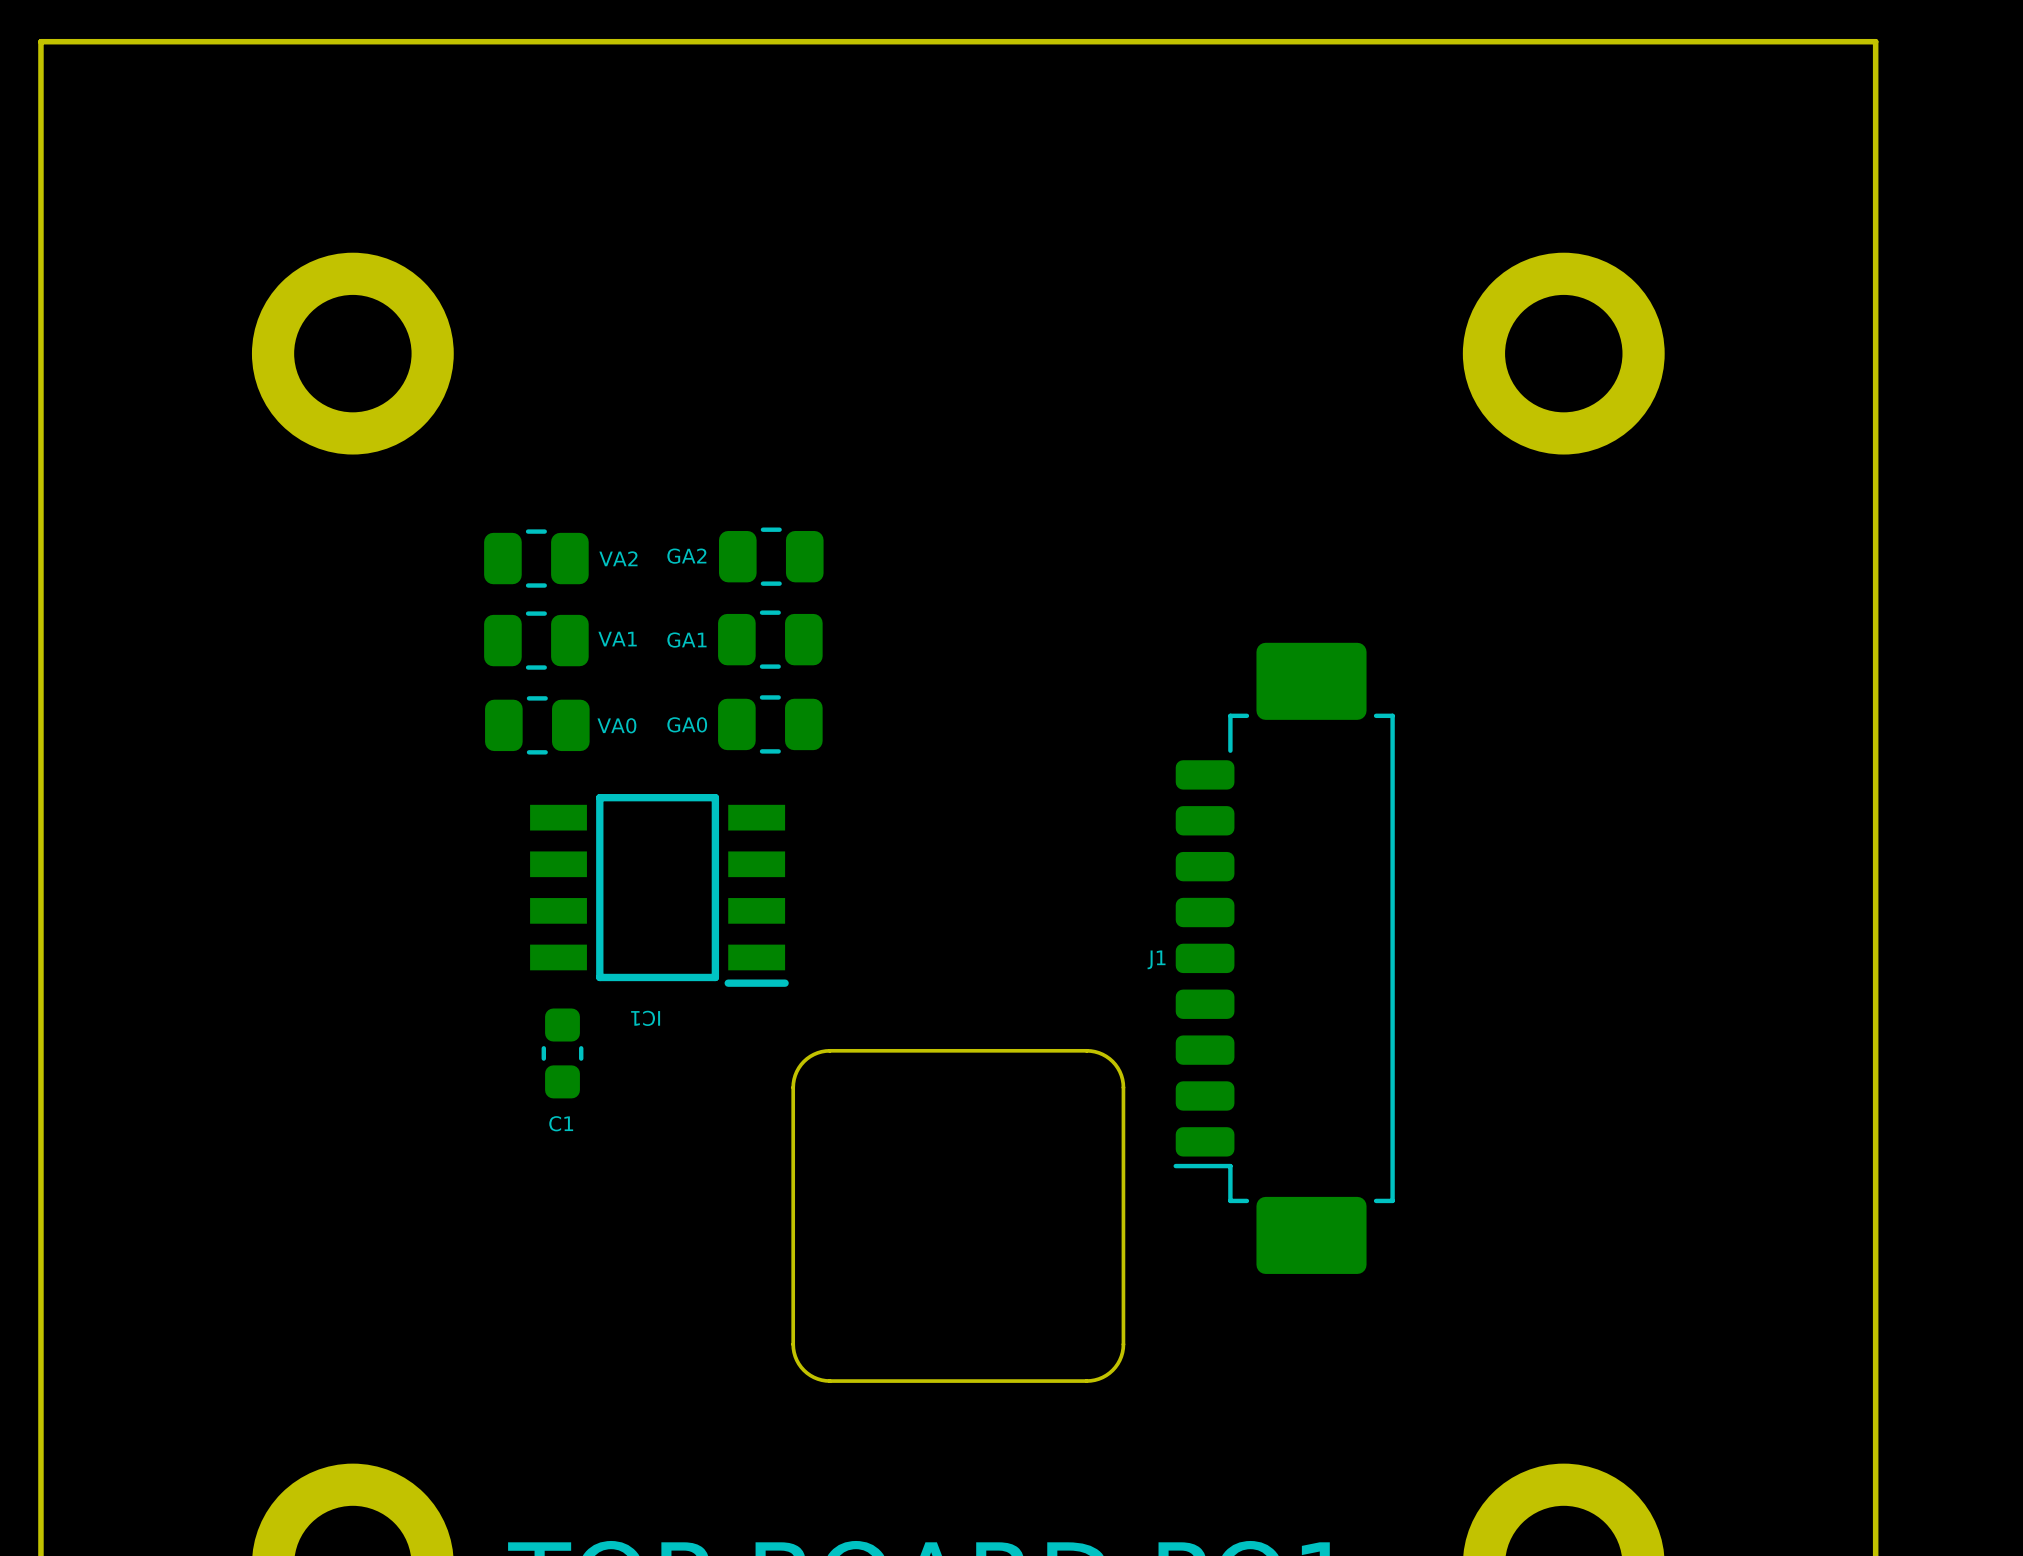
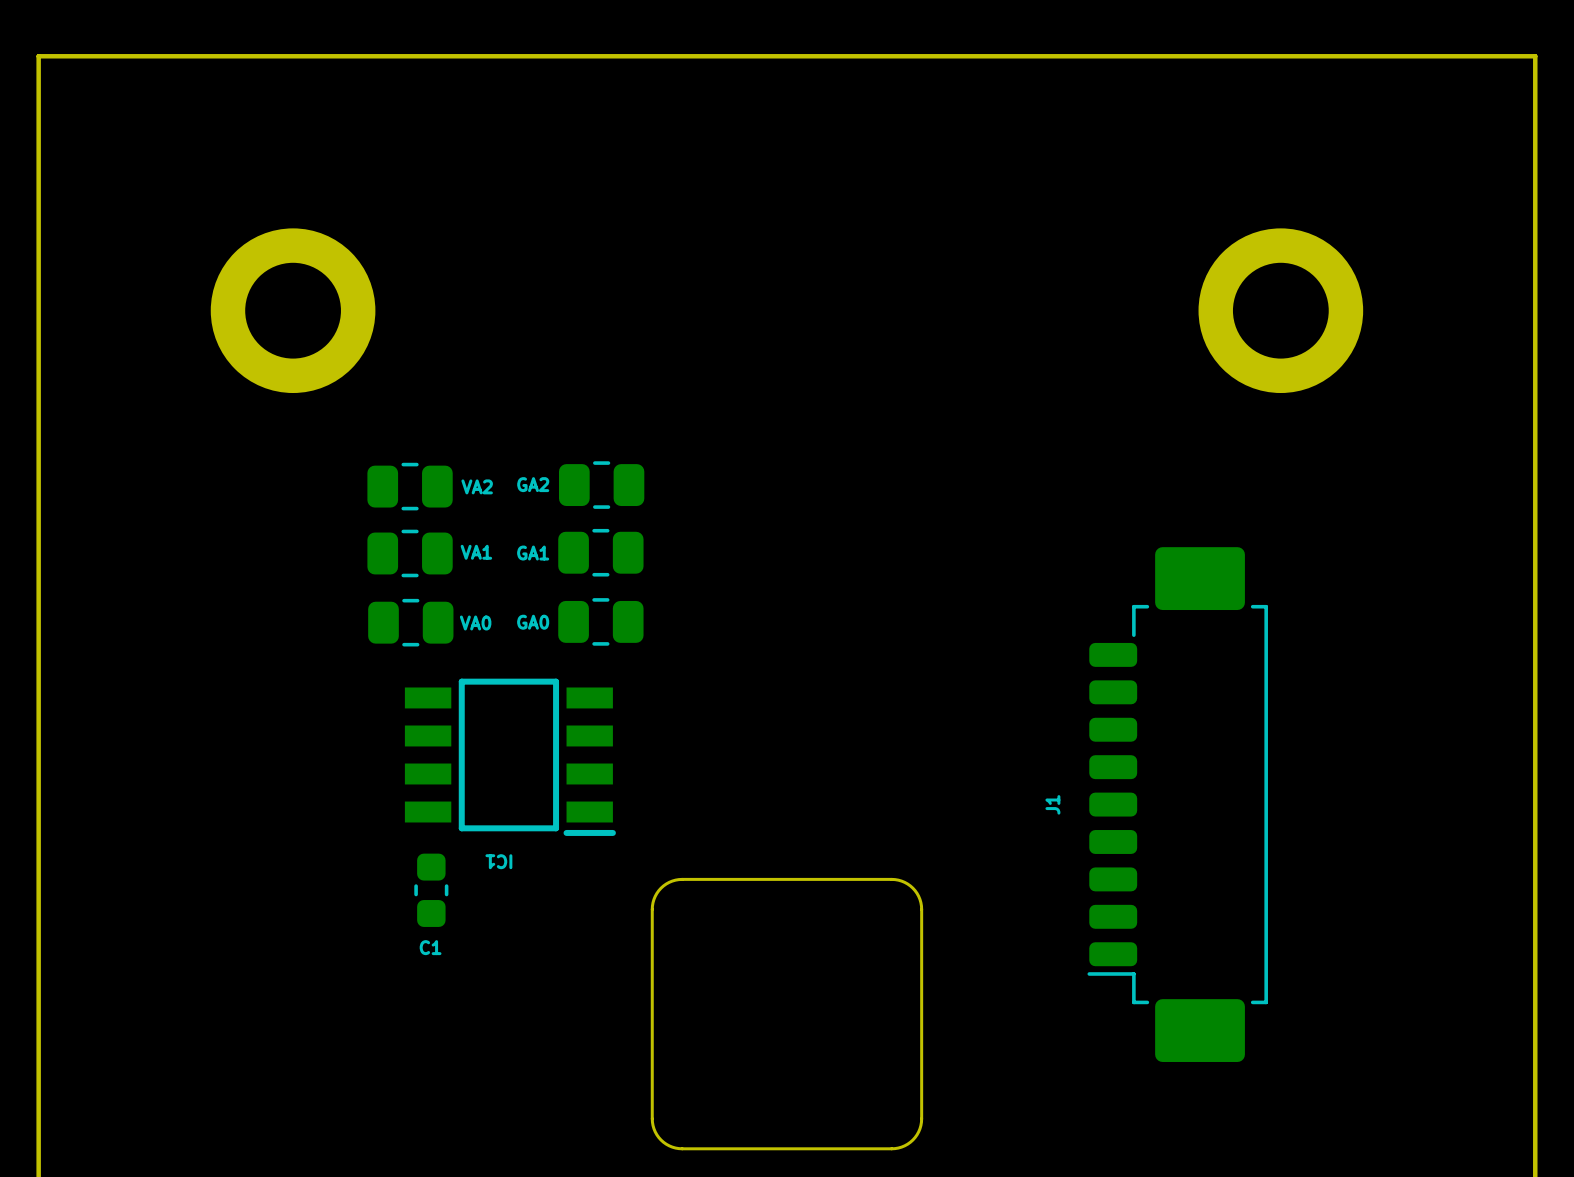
GA2 position: (771, 556) -> (601, 485)
VA2 position: (536, 558) -> (410, 486)
GA1 position: (770, 639) -> (600, 552)
VA1 position: (536, 640) -> (410, 553)
GA0 position: (770, 724) -> (600, 621)
VA0 position: (537, 725) -> (410, 622)
IC1 position: (659, 890) -> (510, 757)
J1 position: (1284, 958) -> (1177, 804)
J1 name rotation: 0° (1156, 959) -> 90° counterclockwise (1052, 804)
C1 position: (562, 1053) -> (431, 890)

